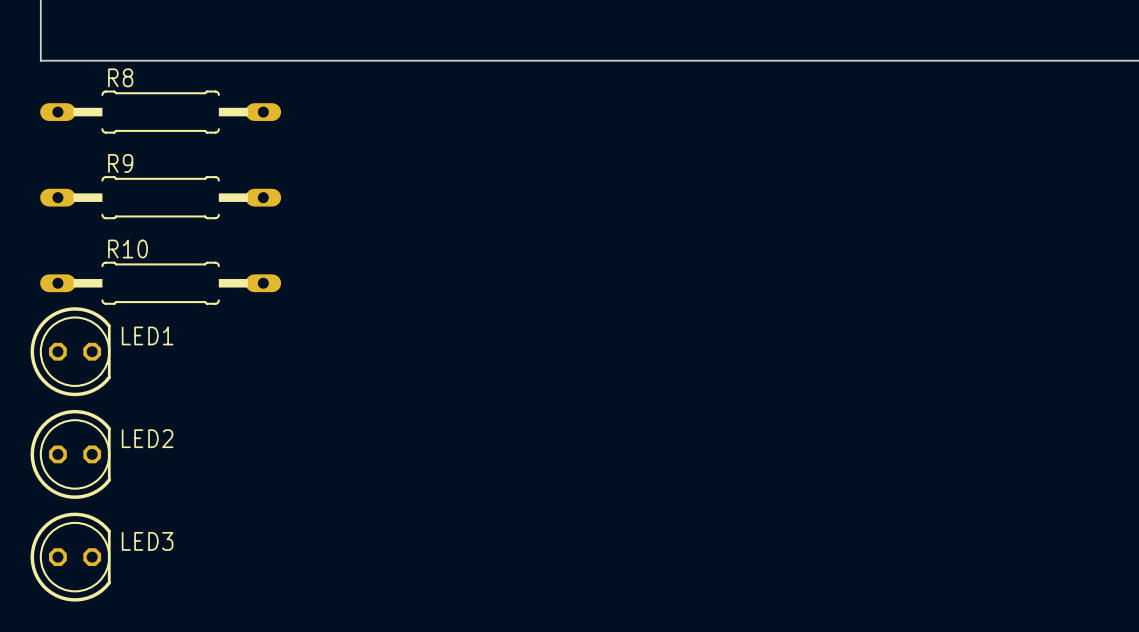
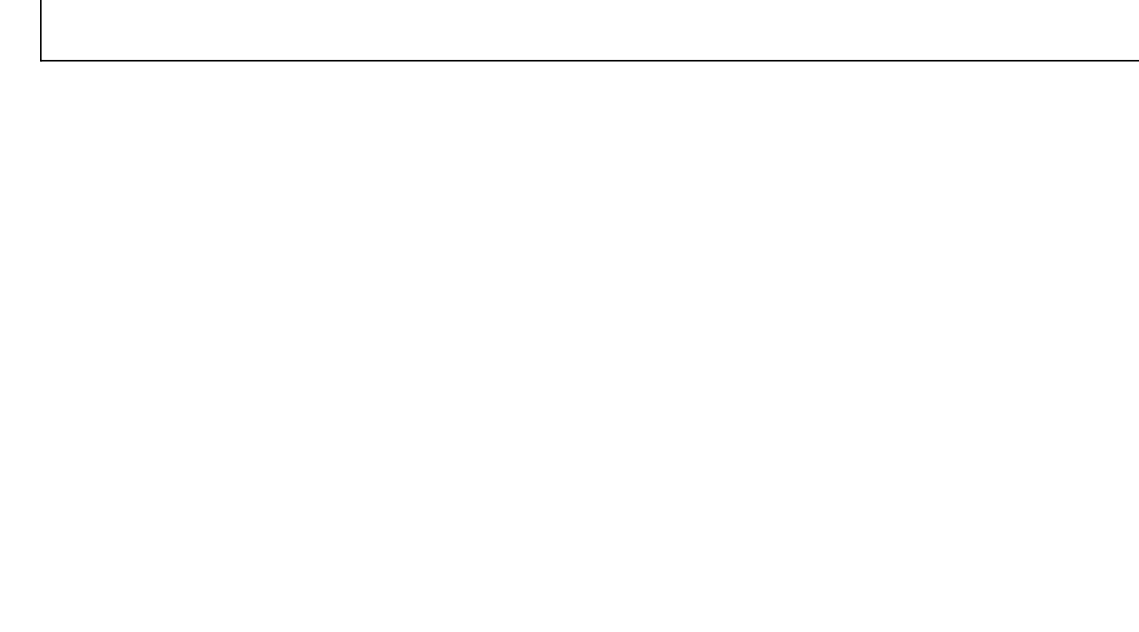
R8: (160, 112) -> none
R9: (160, 197) -> none
R10: (160, 283) -> none
LED1: (70, 351) -> none
LED2: (70, 454) -> none
LED3: (70, 557) -> none

